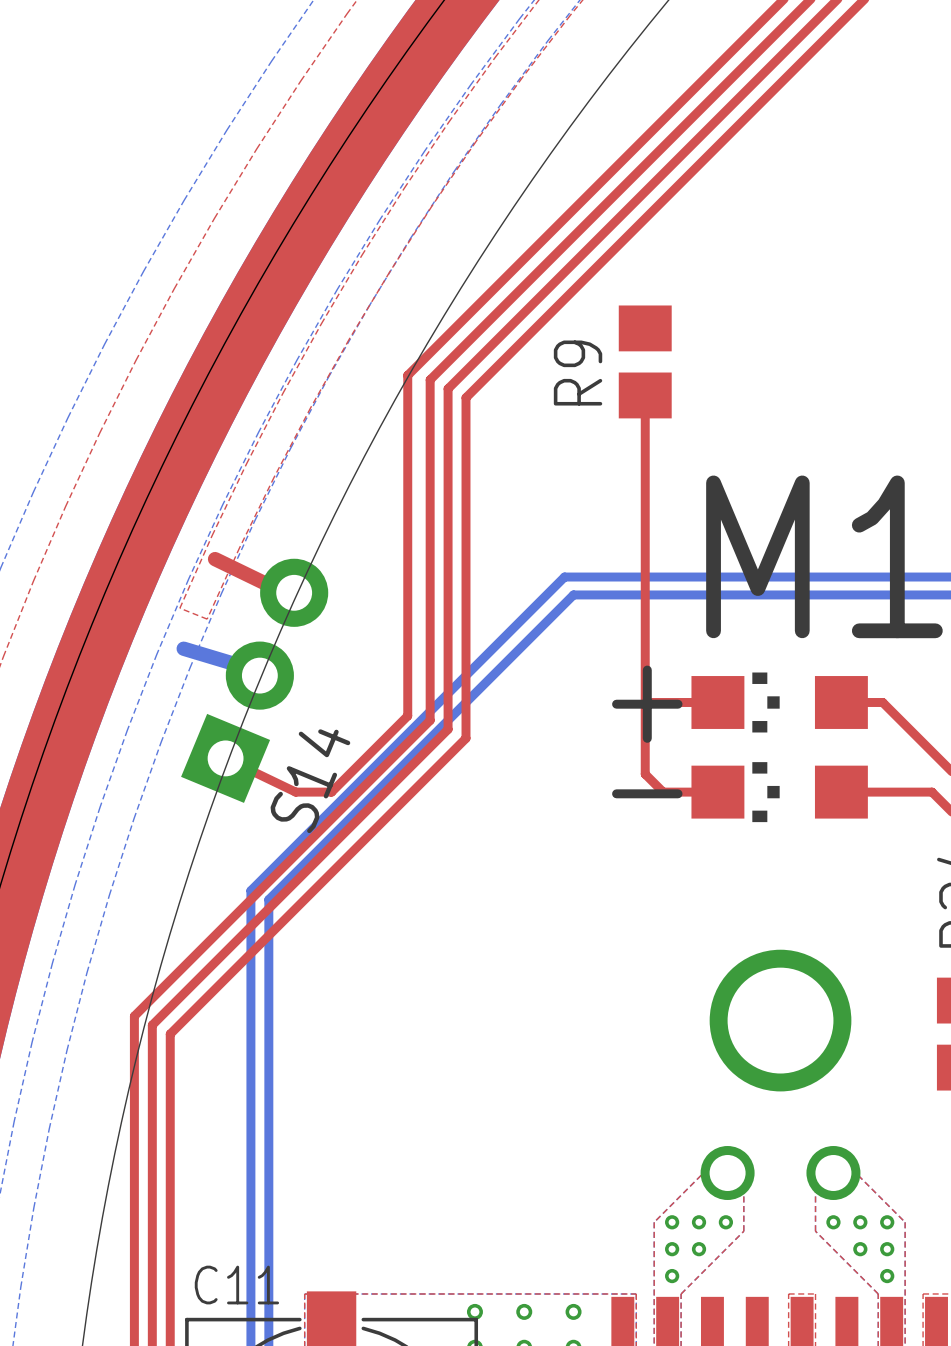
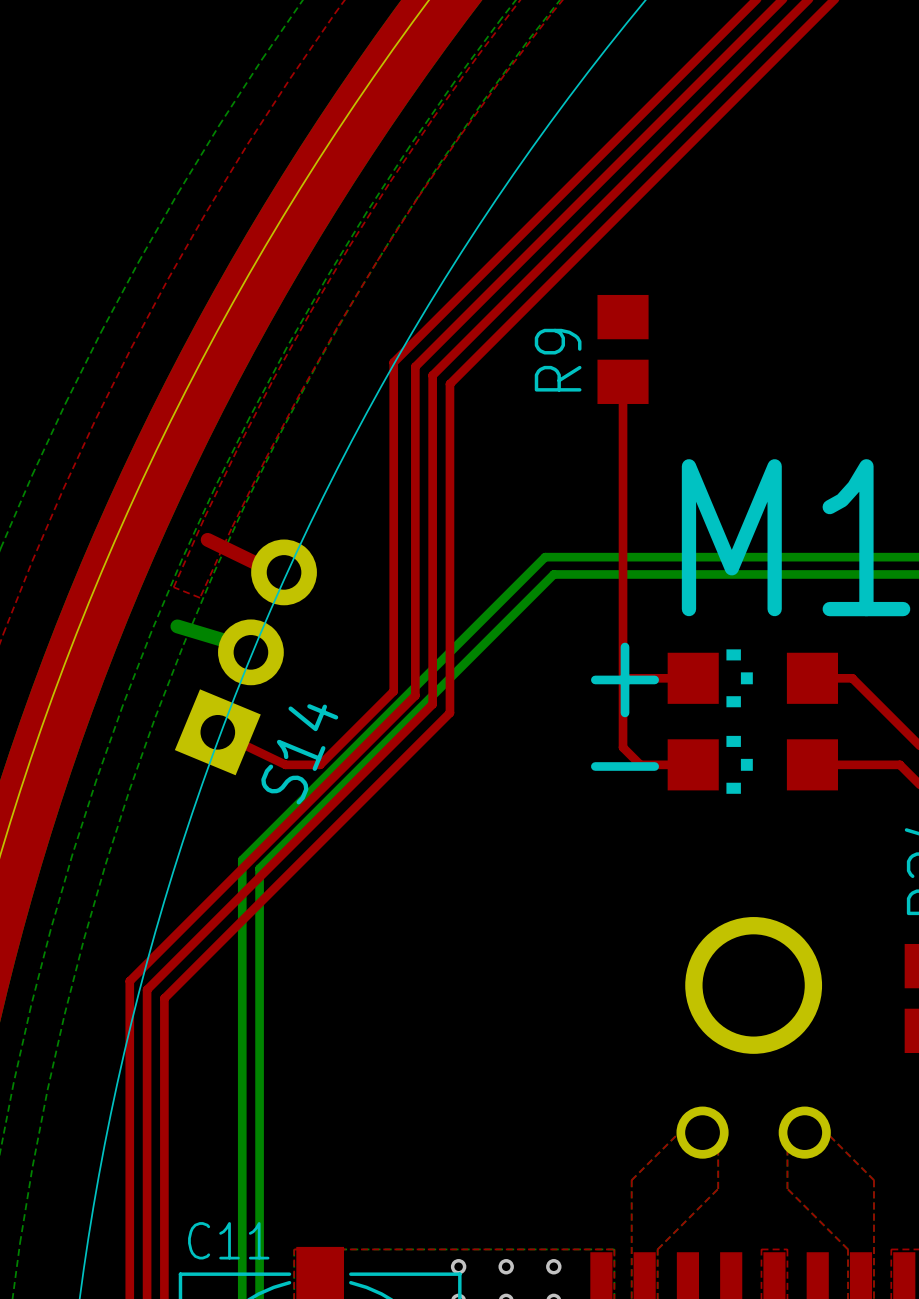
via: (672, 1222) -> none
via: (699, 1222) -> none
via: (725, 1222) -> none
via: (833, 1222) -> none
via: (860, 1222) -> none
via: (887, 1222) -> none
via: (672, 1249) -> none
via: (699, 1249) -> none
via: (860, 1249) -> none
via: (887, 1249) -> none
via: (672, 1276) -> none
via: (887, 1276) -> none

